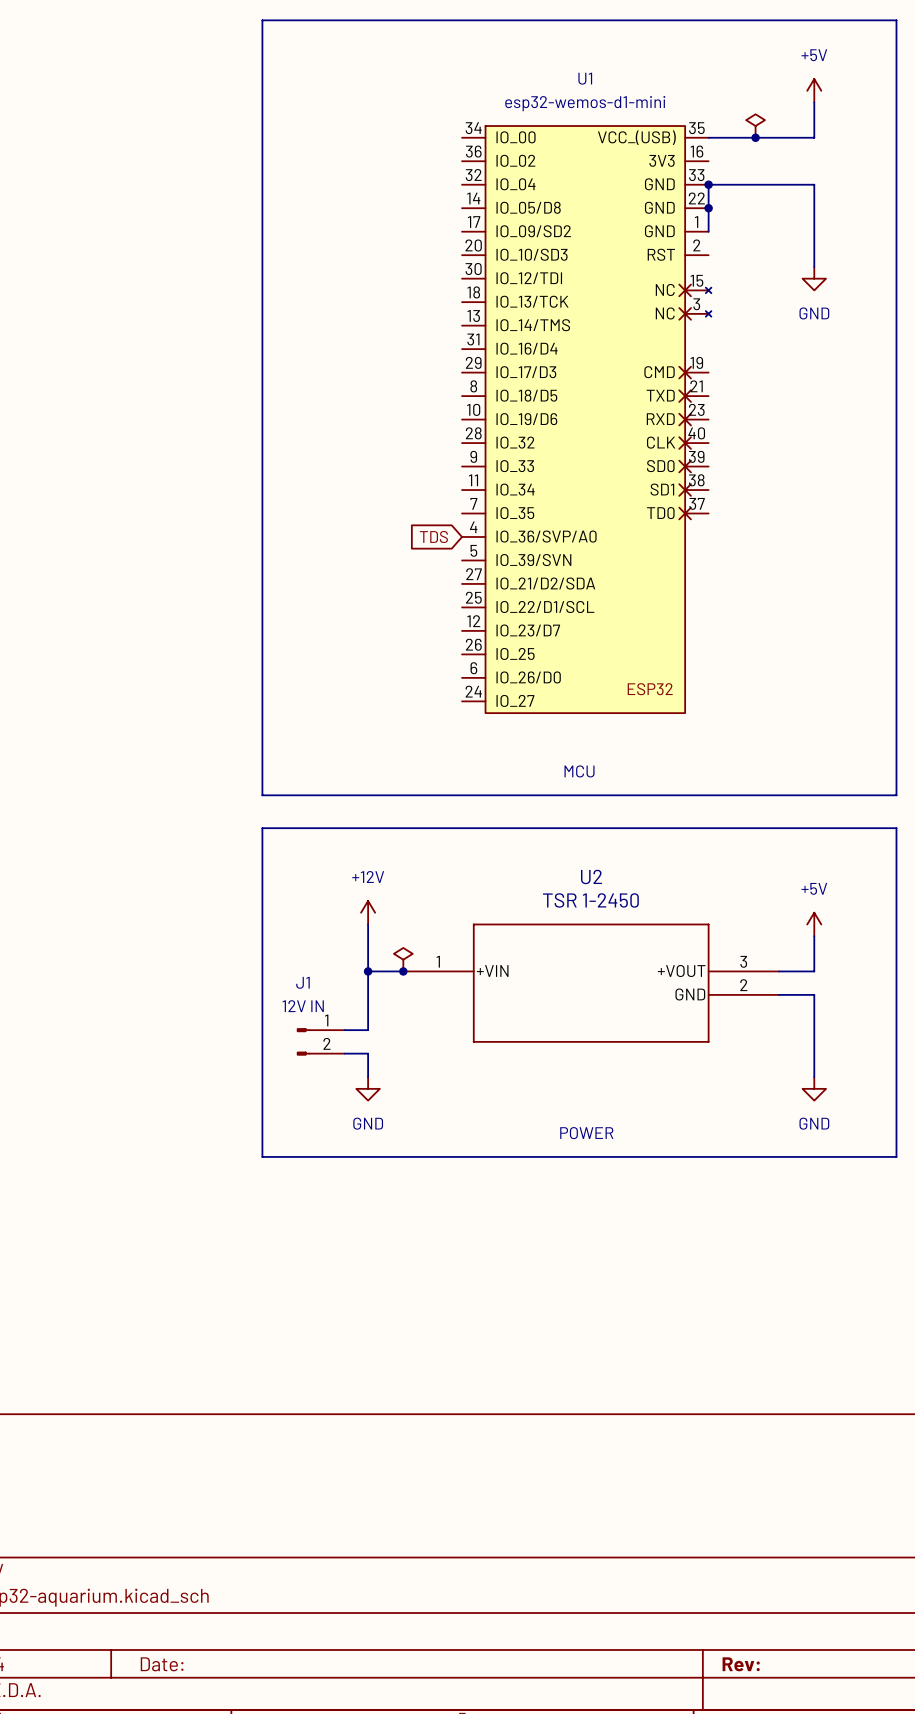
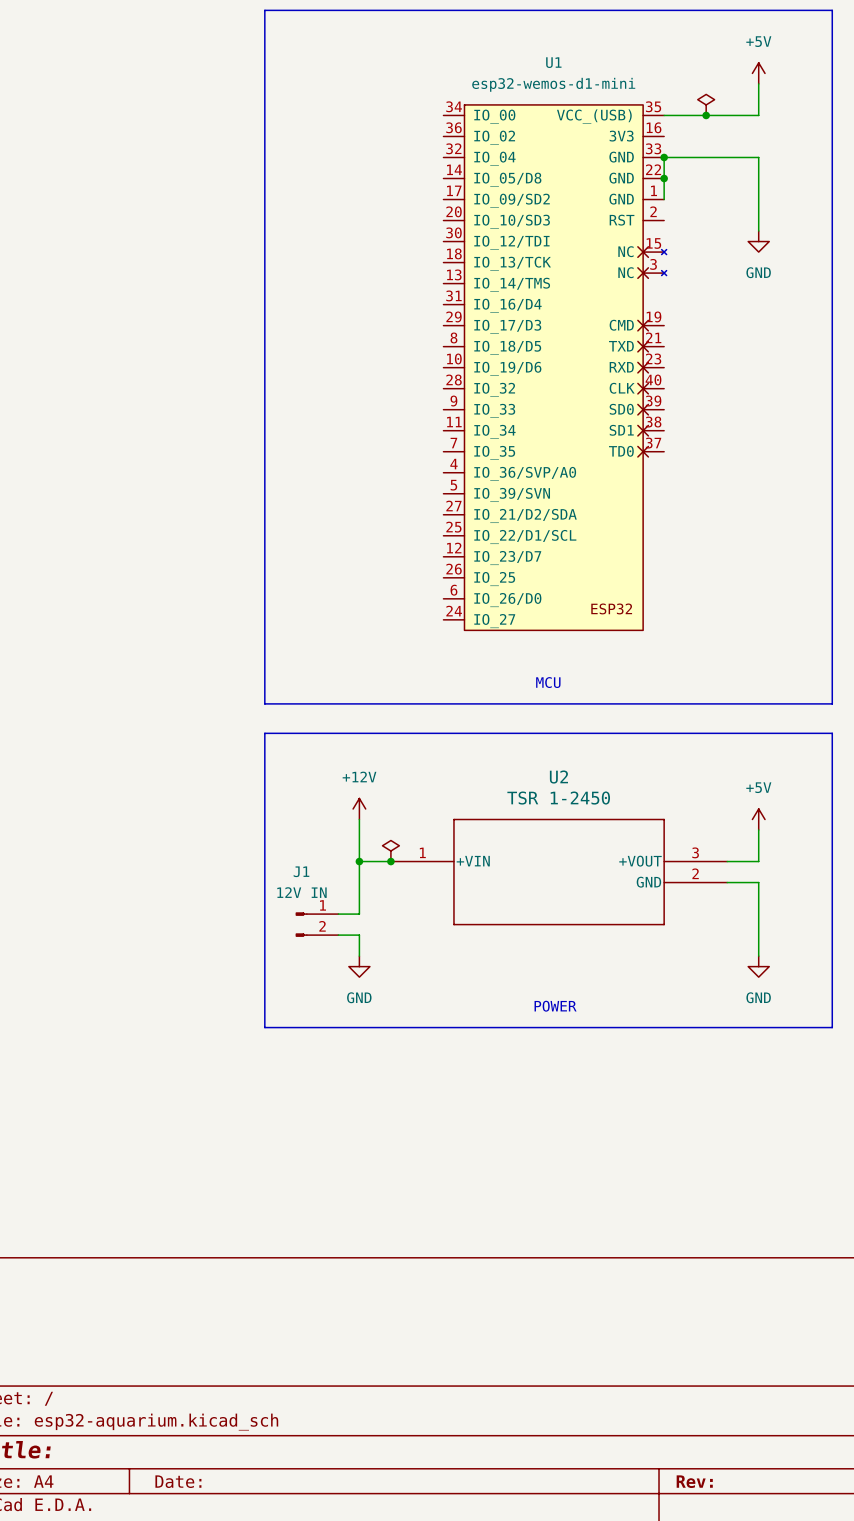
global label: TDS (433, 536) -> none

